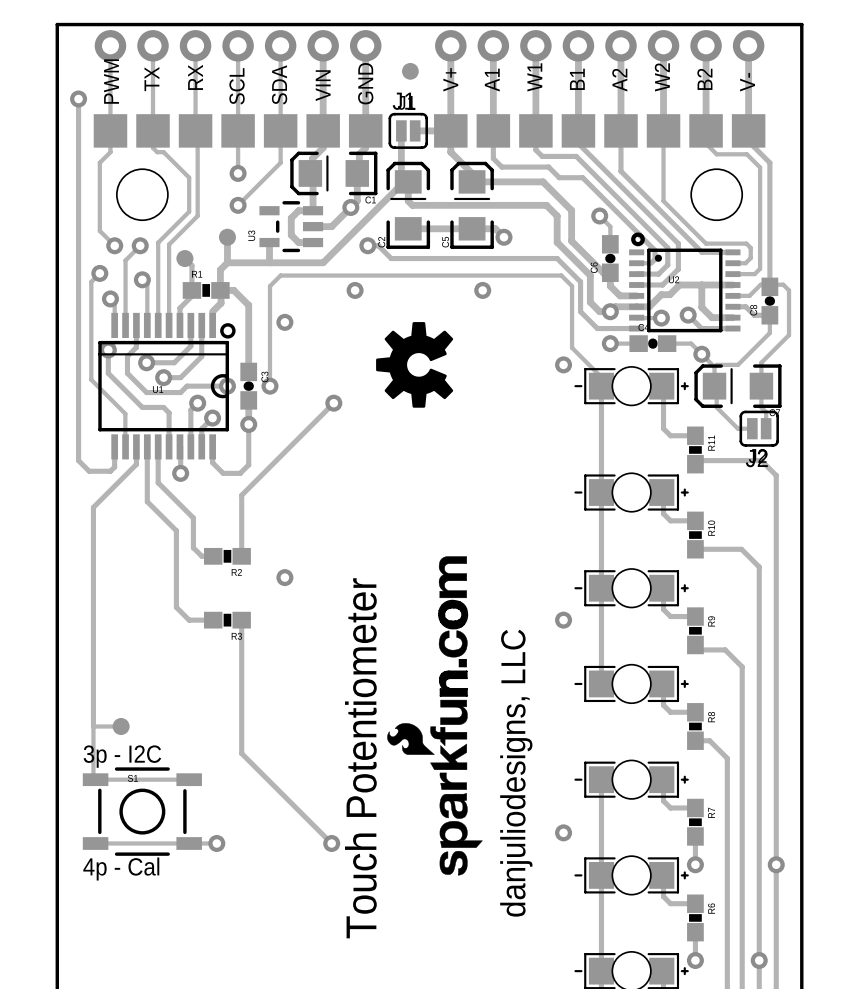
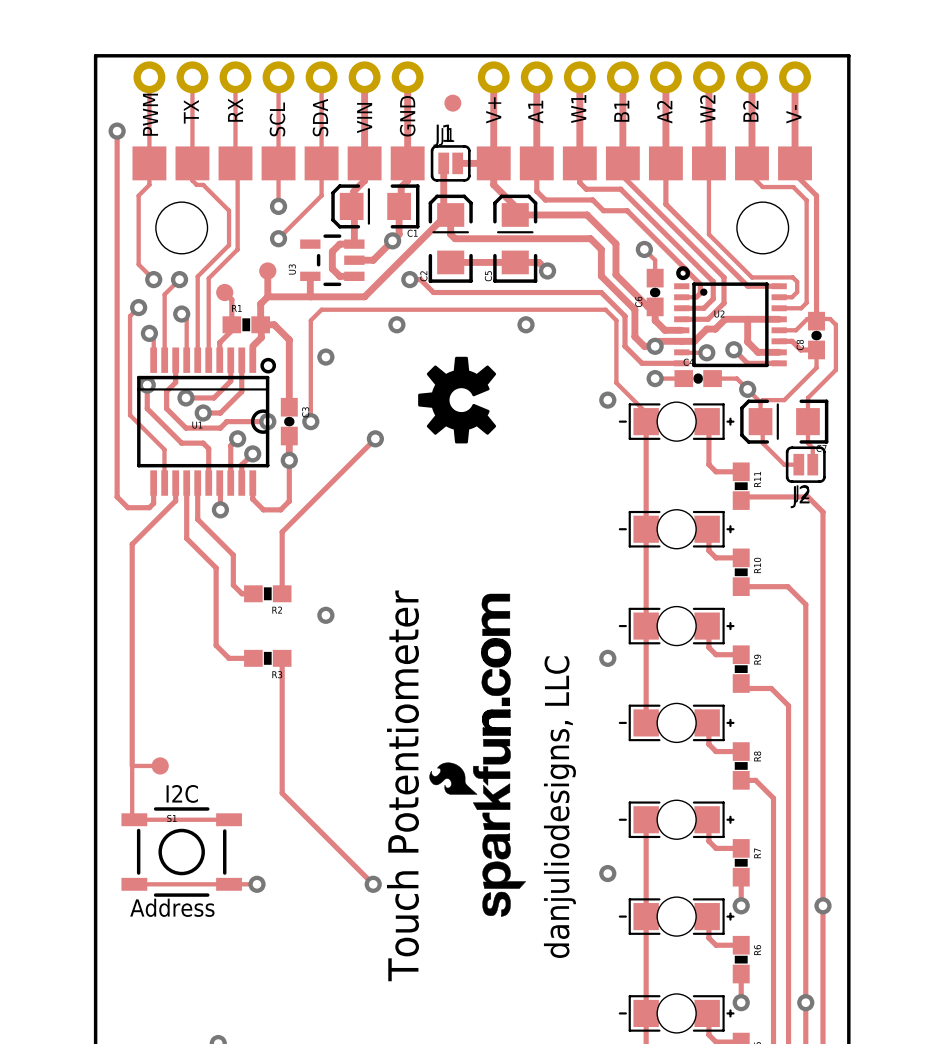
text: none -> I2C (182, 793)
text: 3p - I2C (122, 756) -> none
text: 4p - Cal (121, 869) -> Address (172, 907)

